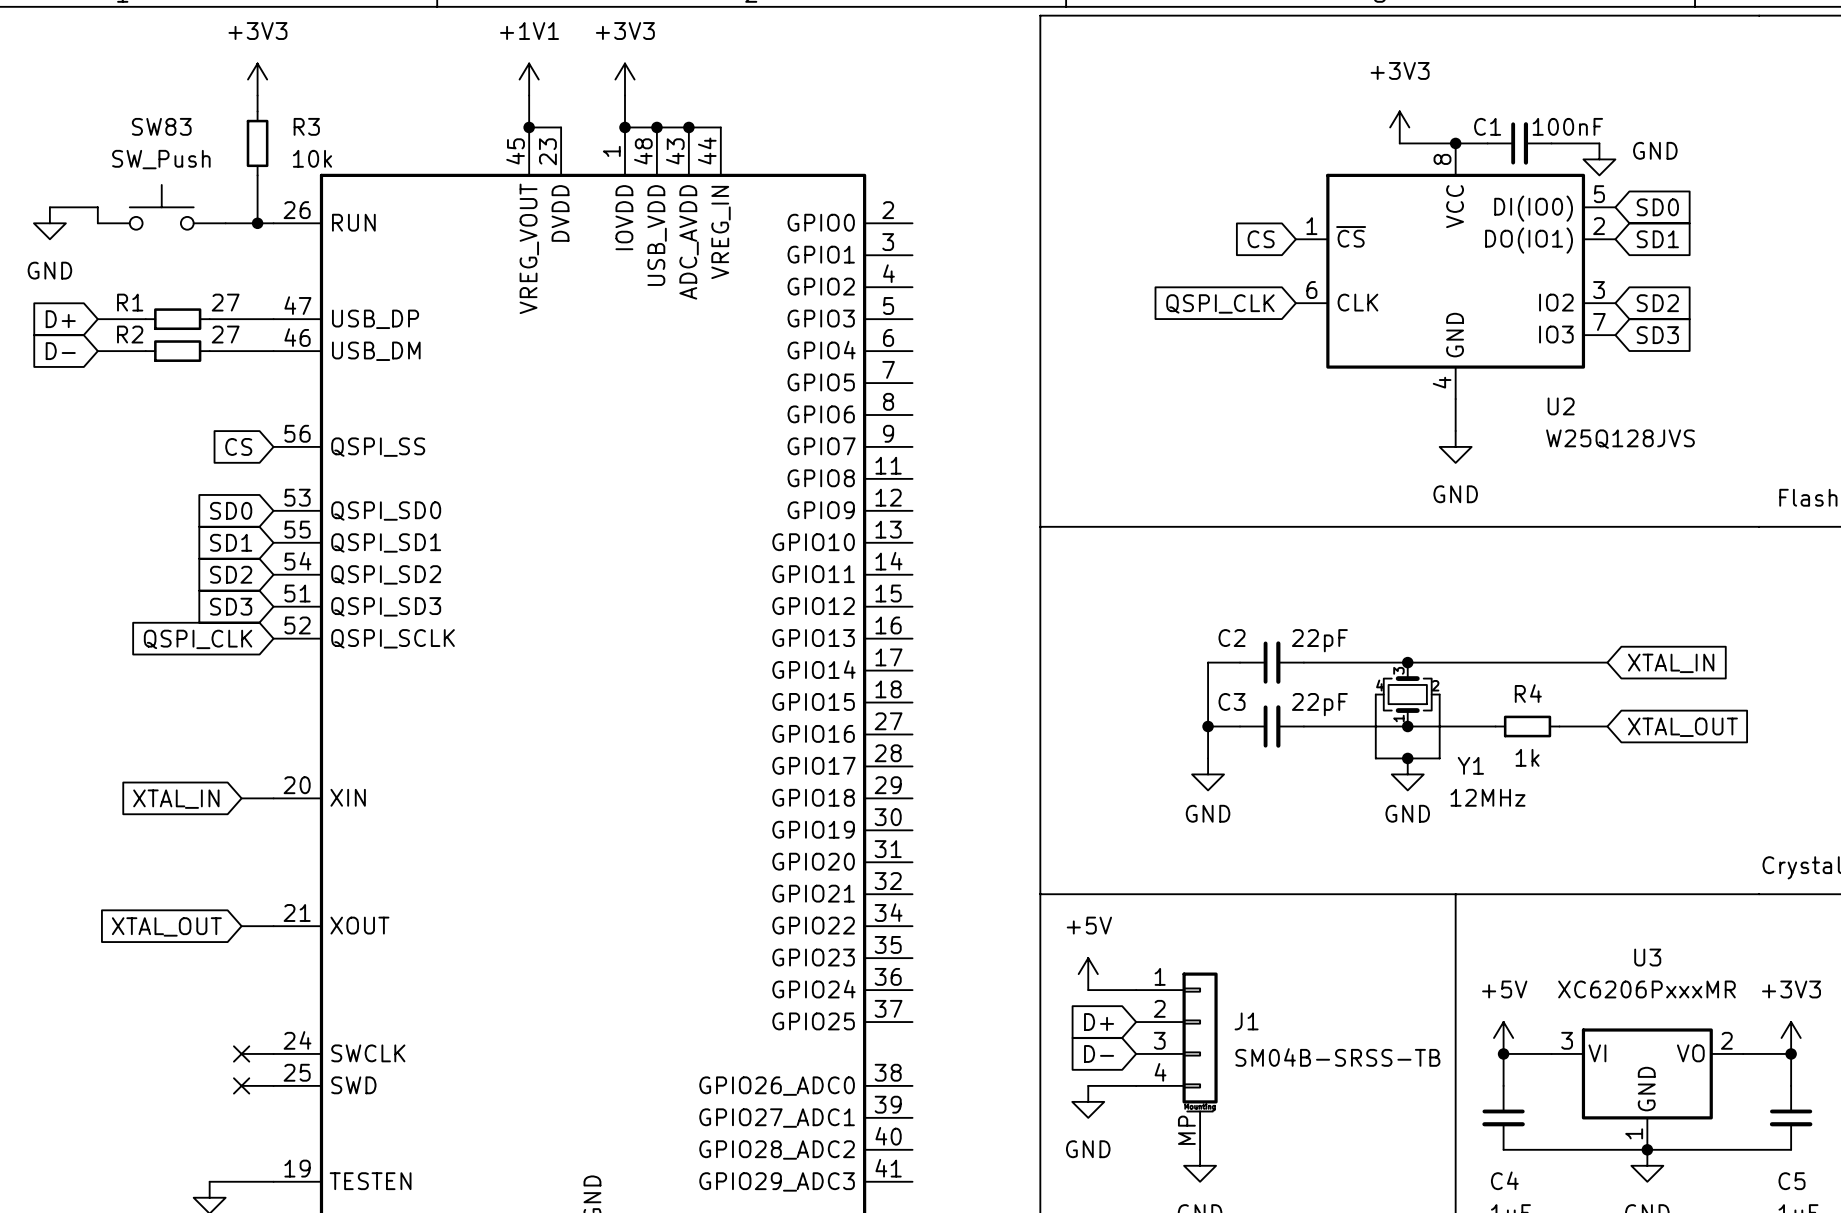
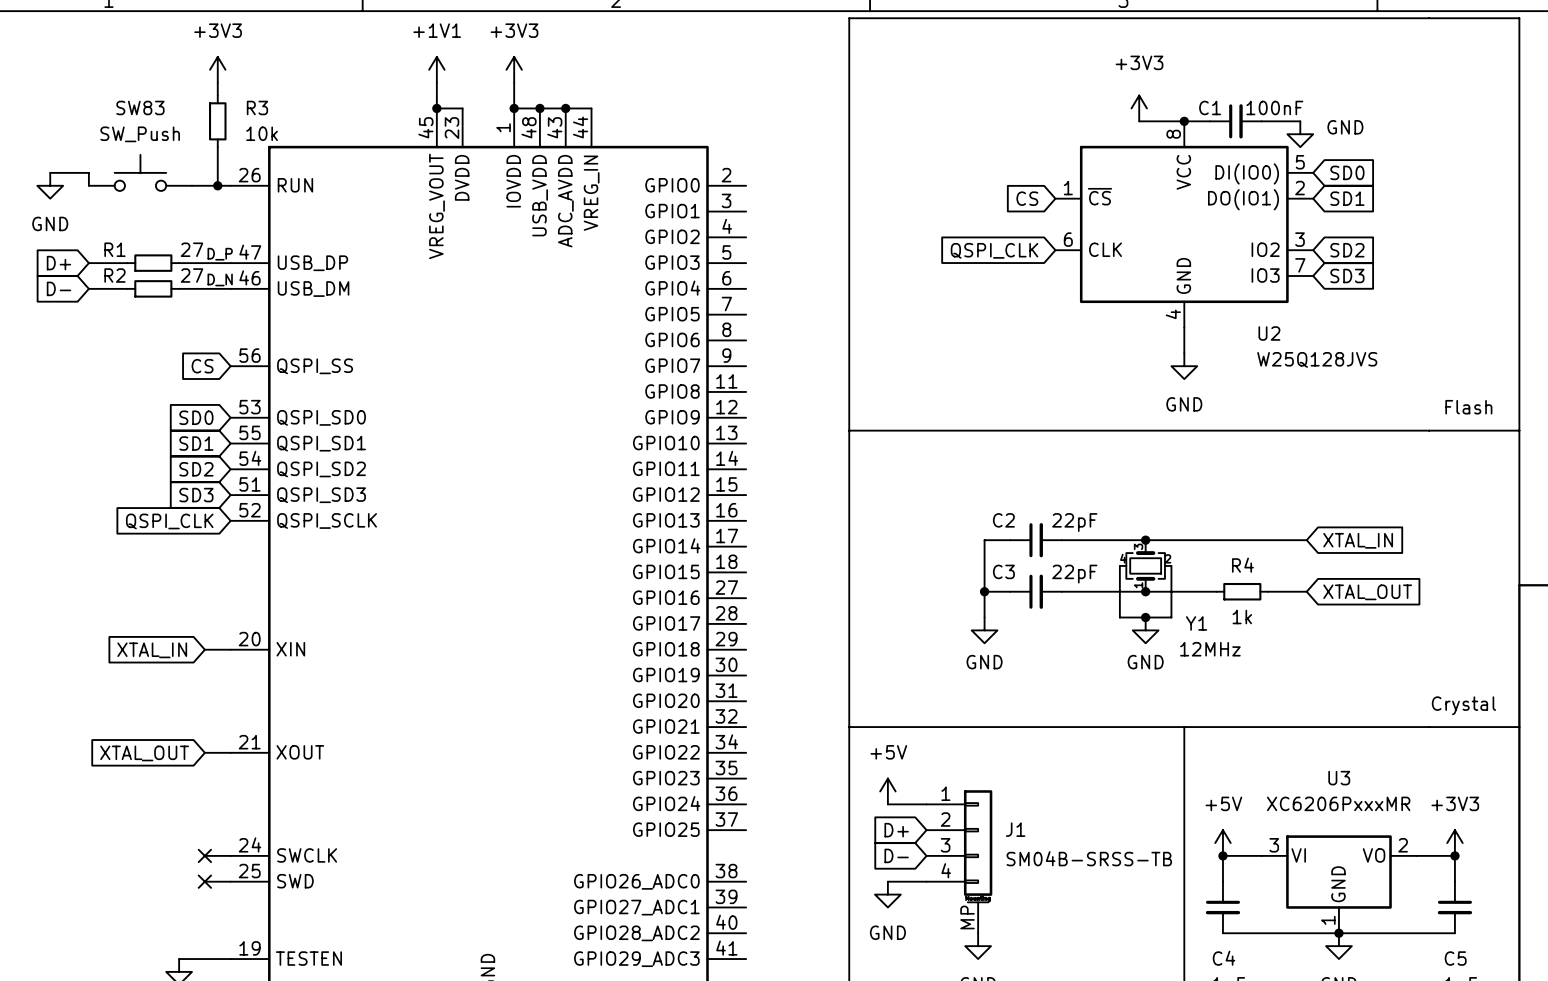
label: none -> D_P (220, 254)
label: none -> D_N (220, 279)

